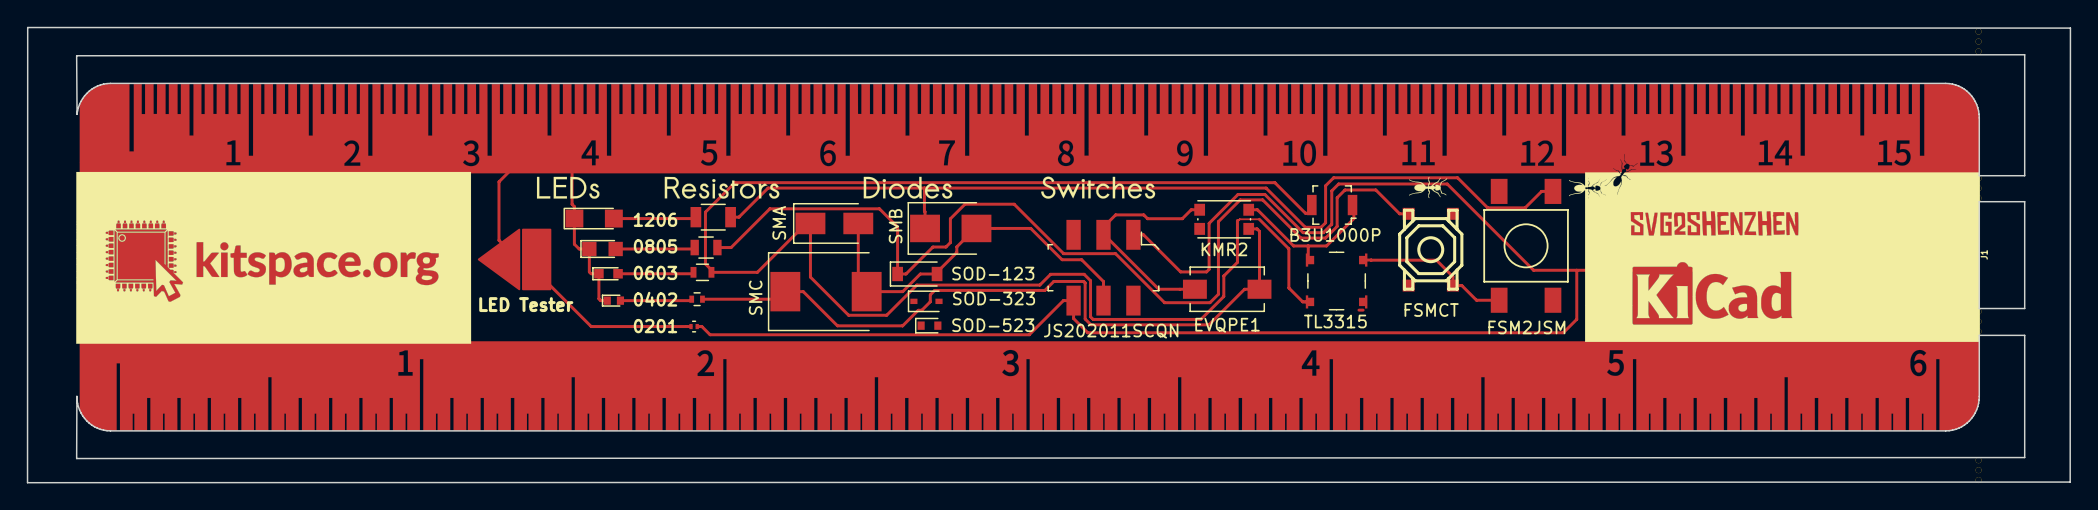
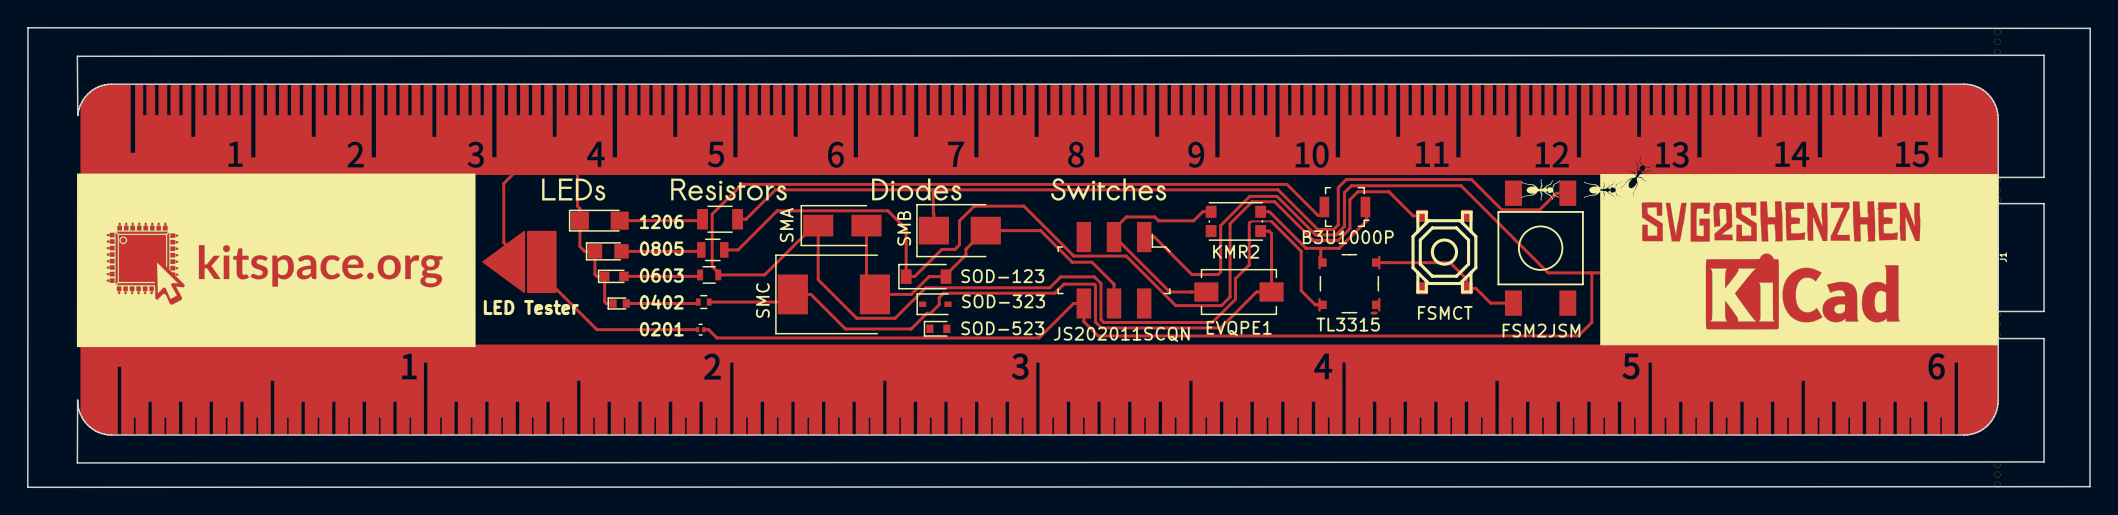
part footprint: [26, 26, 2072, 484] -> [27, 27, 2091, 488]

